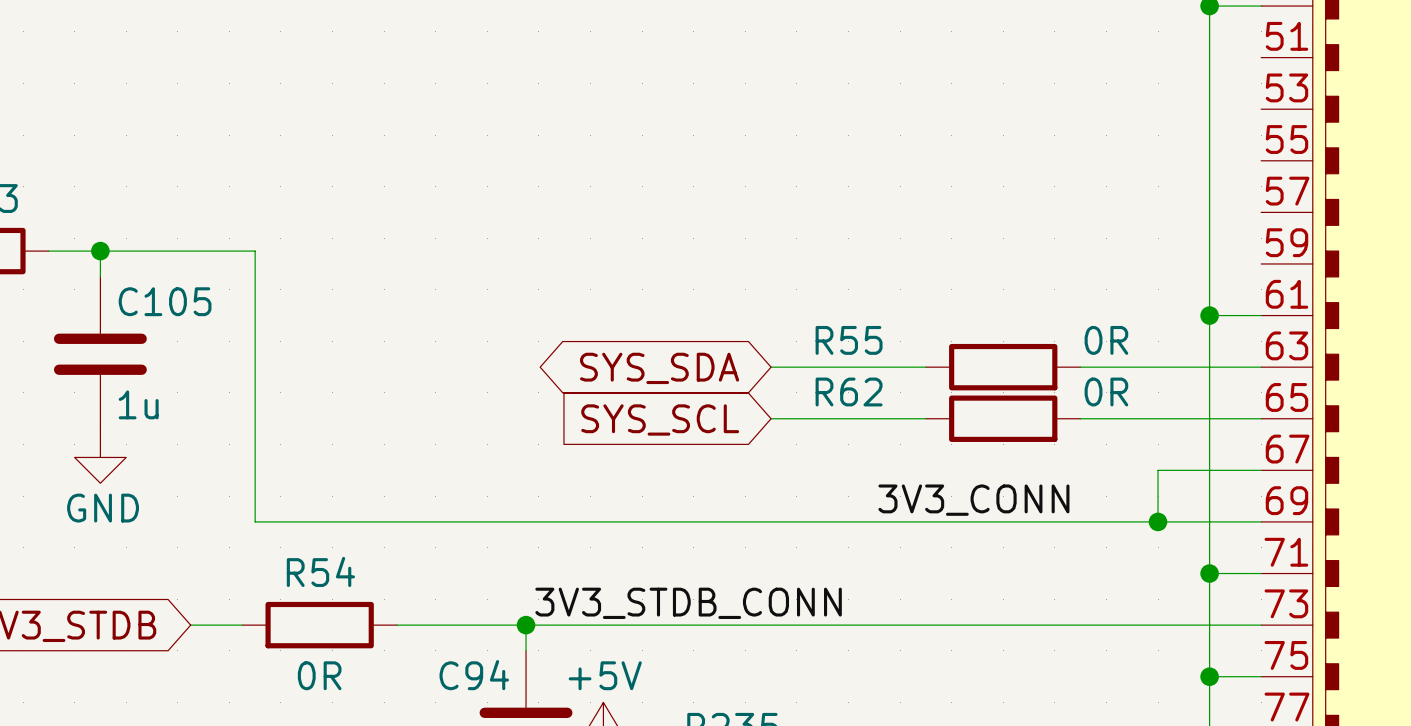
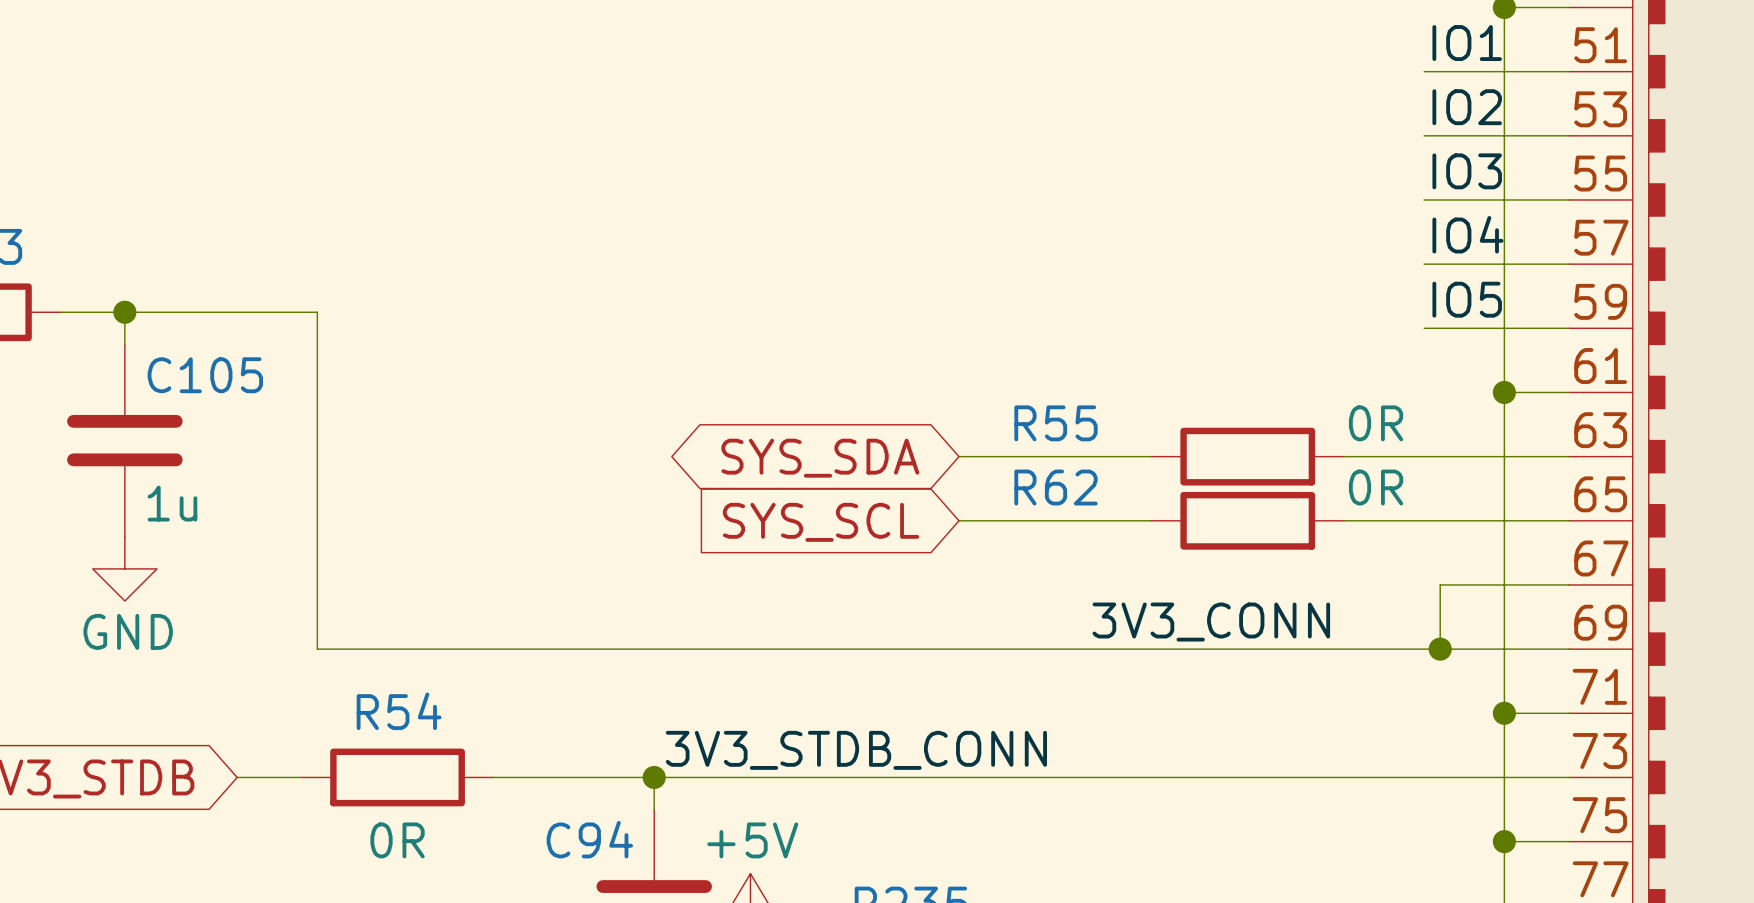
label: none -> IO1 (1467, 43)
wire: none -> (1424, 71) (1568, 71)
label: none -> IO2 (1467, 107)
wire: none -> (1424, 135) (1568, 135)
label: none -> IO3 (1467, 171)
wire: none -> (1424, 199) (1568, 199)
label: none -> IO4 (1467, 234)
wire: none -> (1424, 264) (1568, 264)
label: none -> IO5 (1467, 299)
wire: none -> (1424, 328) (1568, 328)

